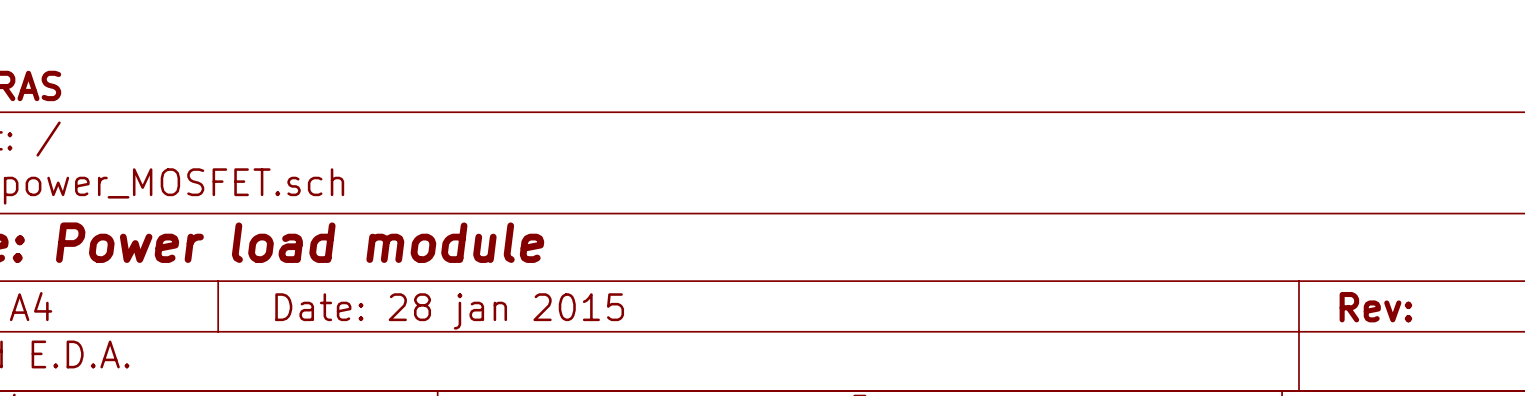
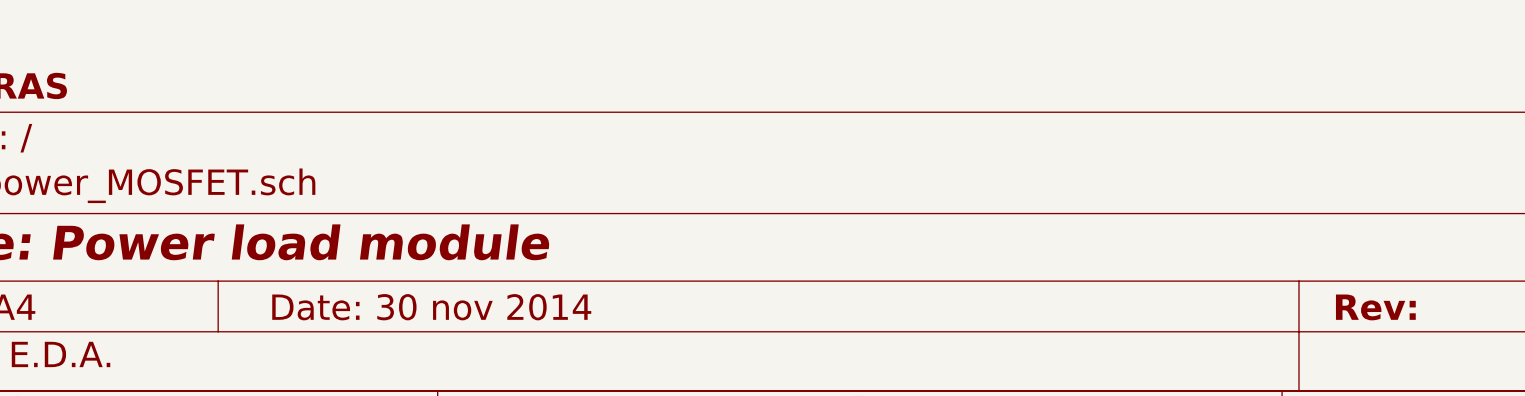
title block: Date: 28 jan 2015 (449, 311) -> Date: 30 nov 2014 (431, 307)

